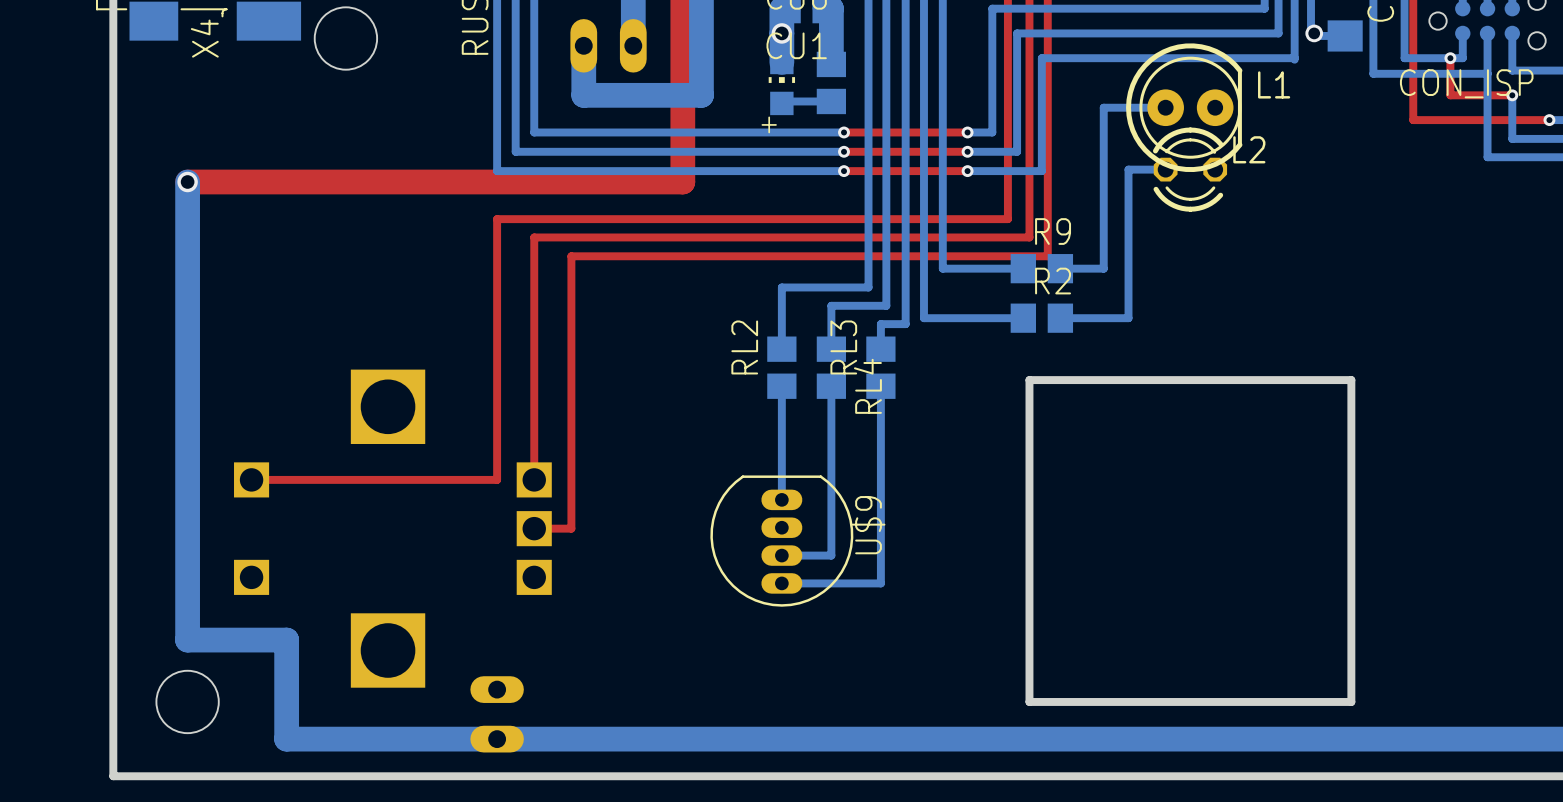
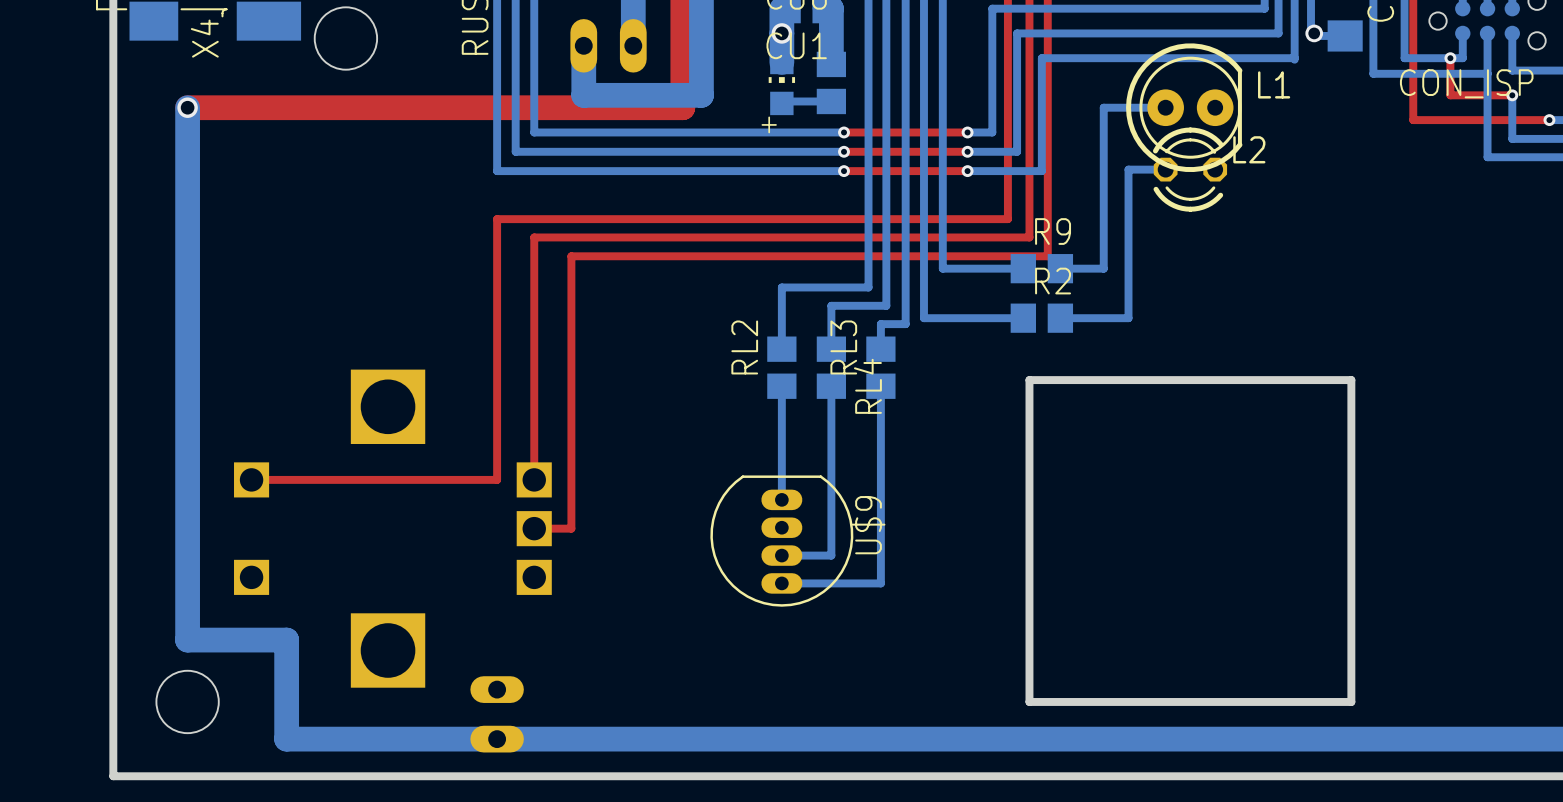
bottom track: none -> (187, 107) (187, 182)
top track: (682, 107) (682, 182) (187, 182) -> (682, 107) (187, 107)
via position: (187, 182) -> (187, 107)

